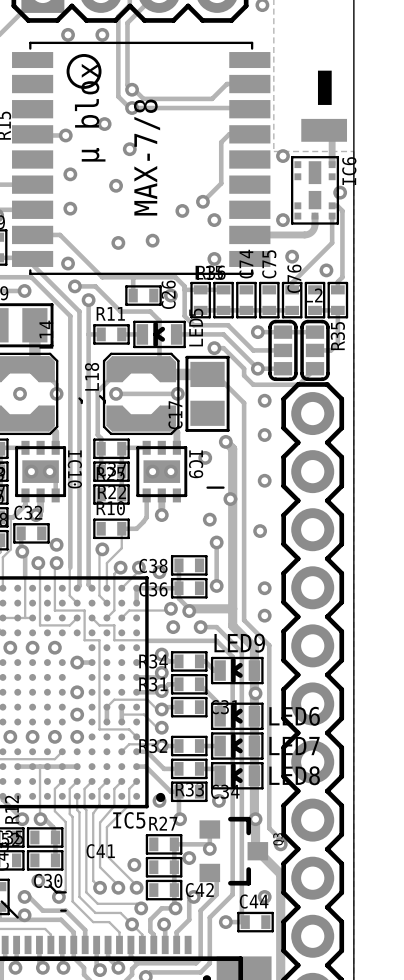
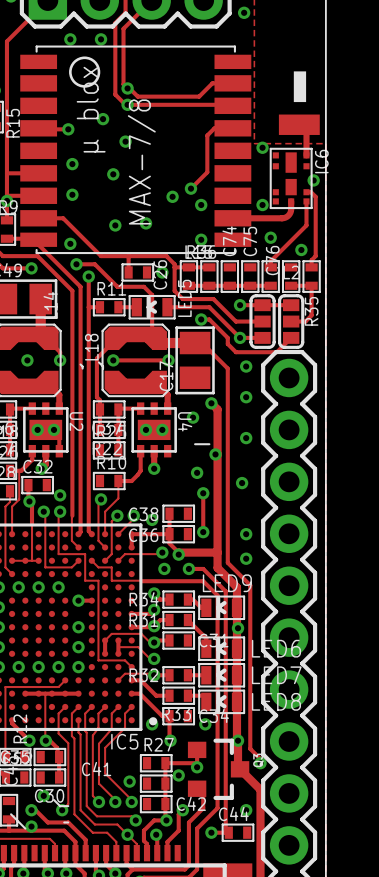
IC9 name: IC9 (196, 464) -> U4 (185, 421)
IC10 name: IC10 (74, 469) -> U2 (76, 421)

